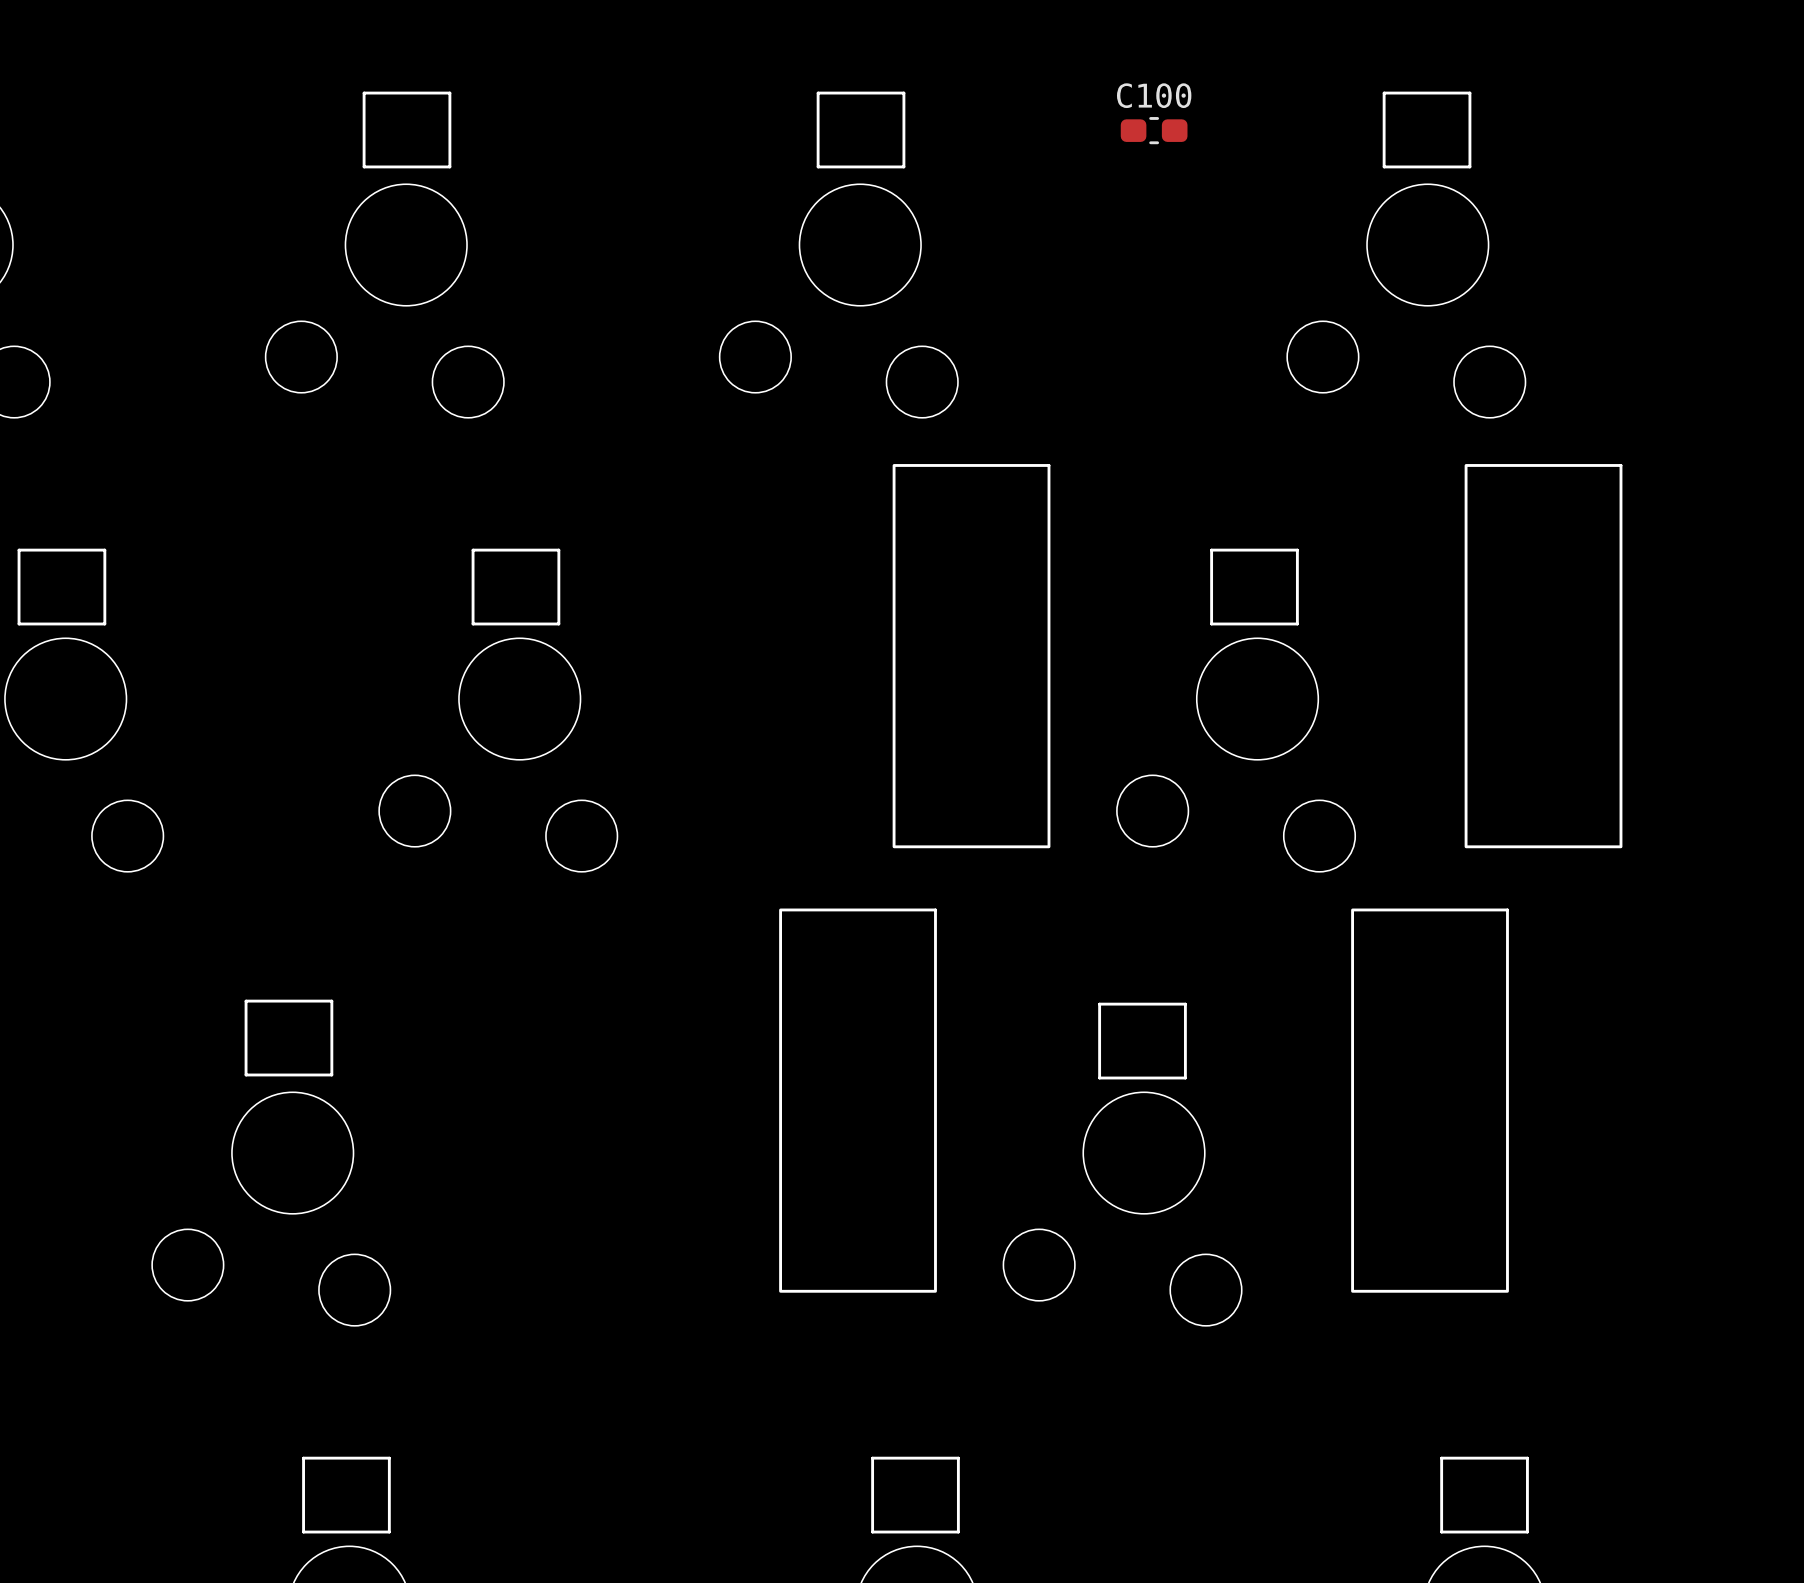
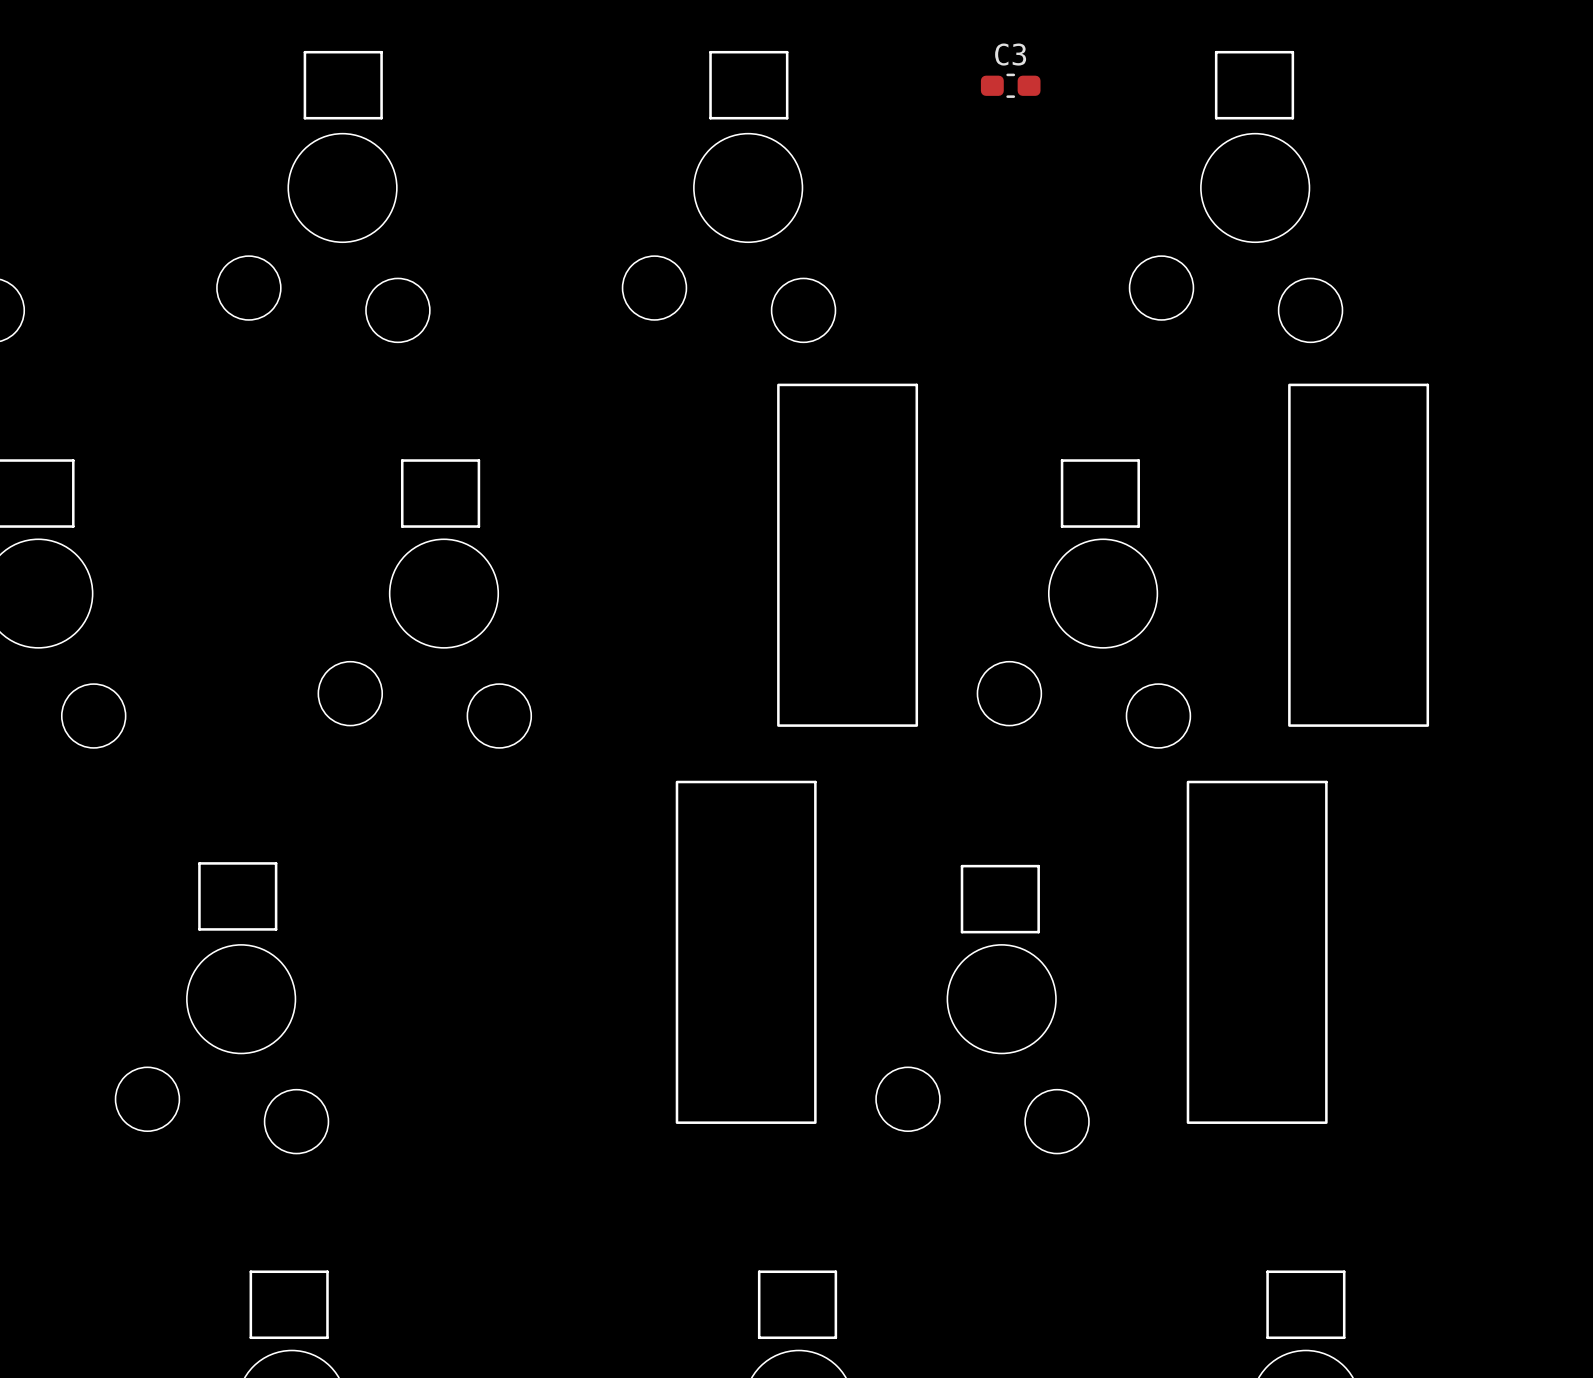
C100 name: C100 (1154, 95) -> C3 (1010, 54)

